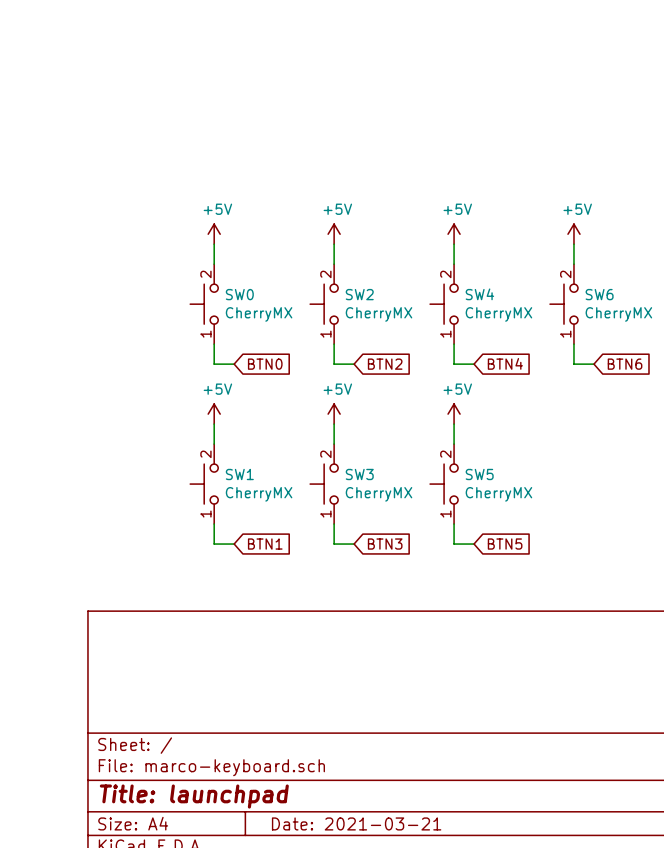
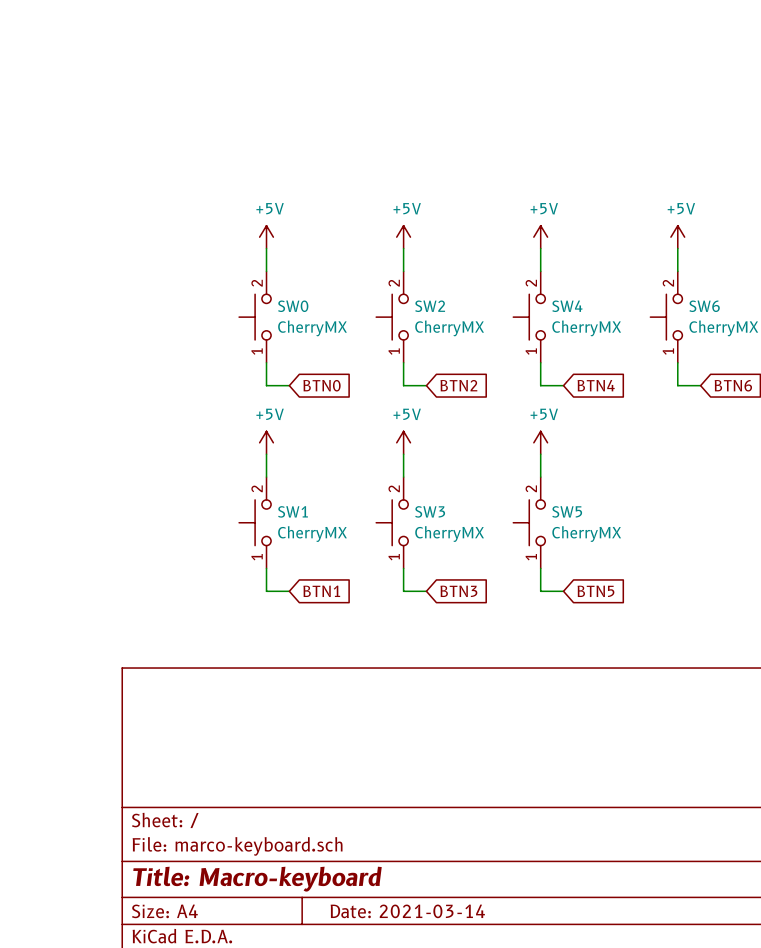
title block: Title: launchpad (194, 796) -> Title: Macro-keyboard (257, 879)
title block: Date: 2021-03-21 (356, 823) -> Date: 2021-03-14 (407, 911)

